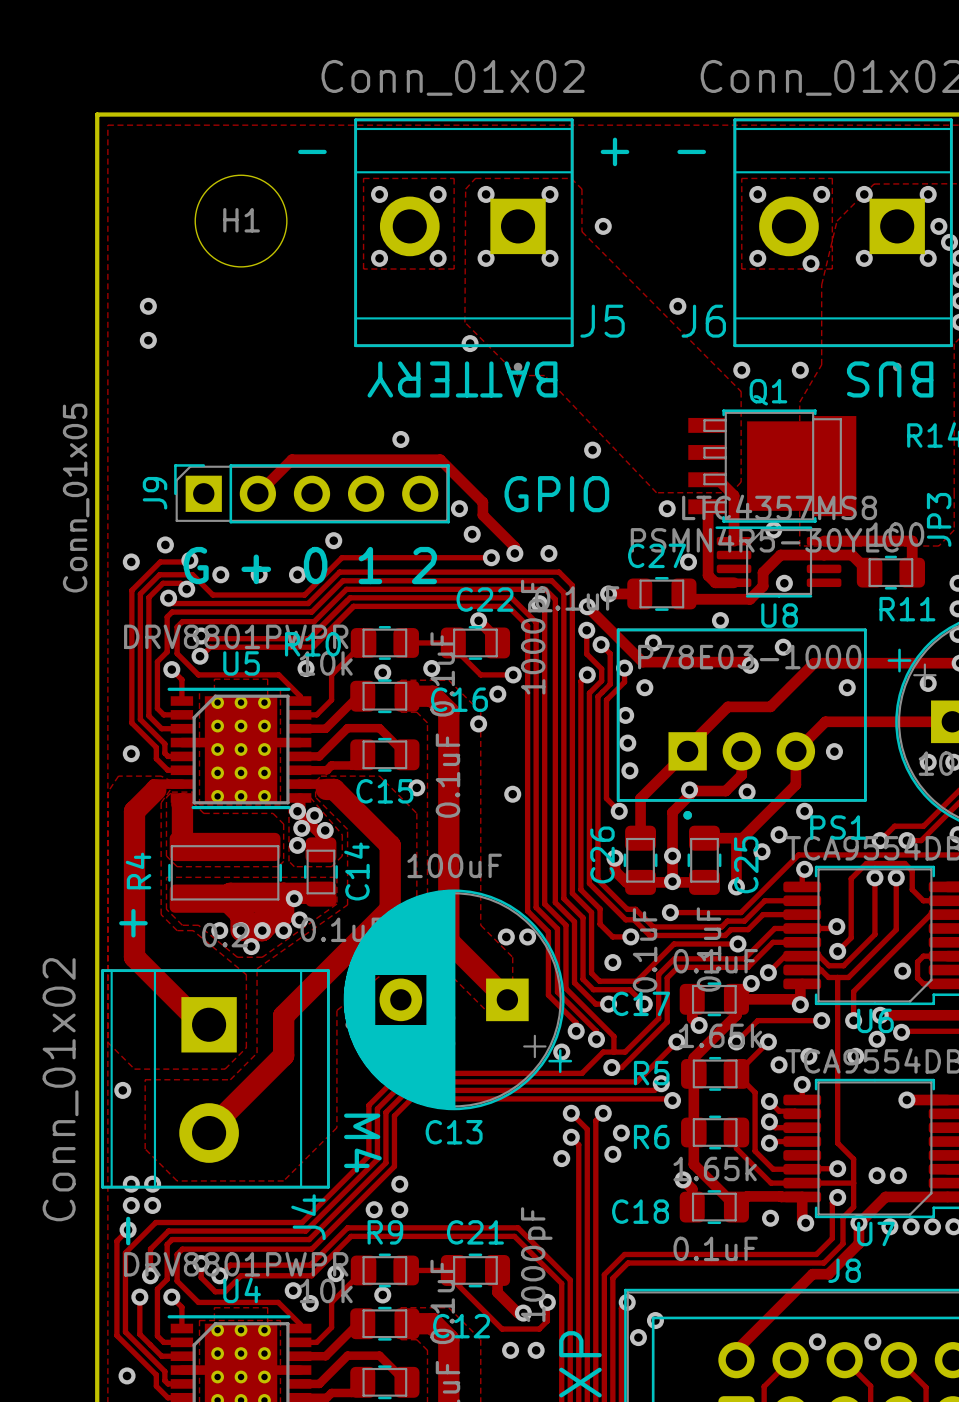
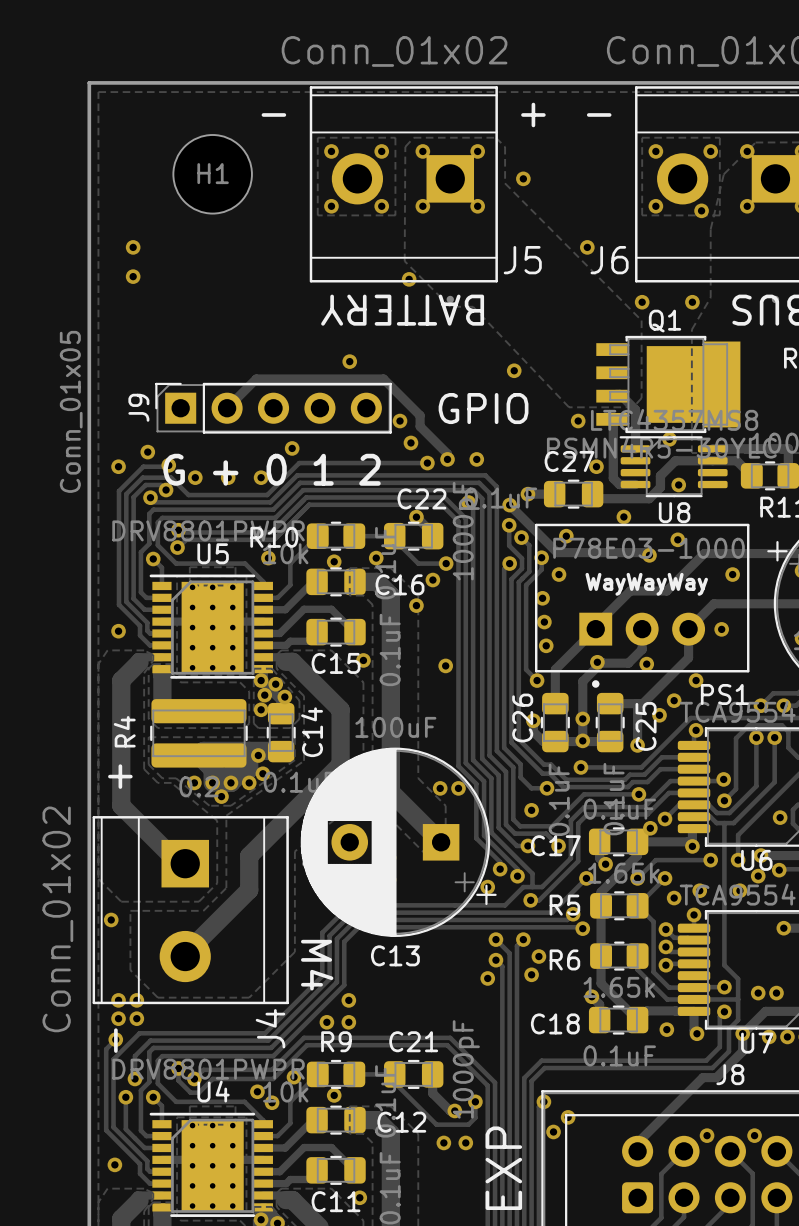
text: none -> WayWayWay (646, 584)

